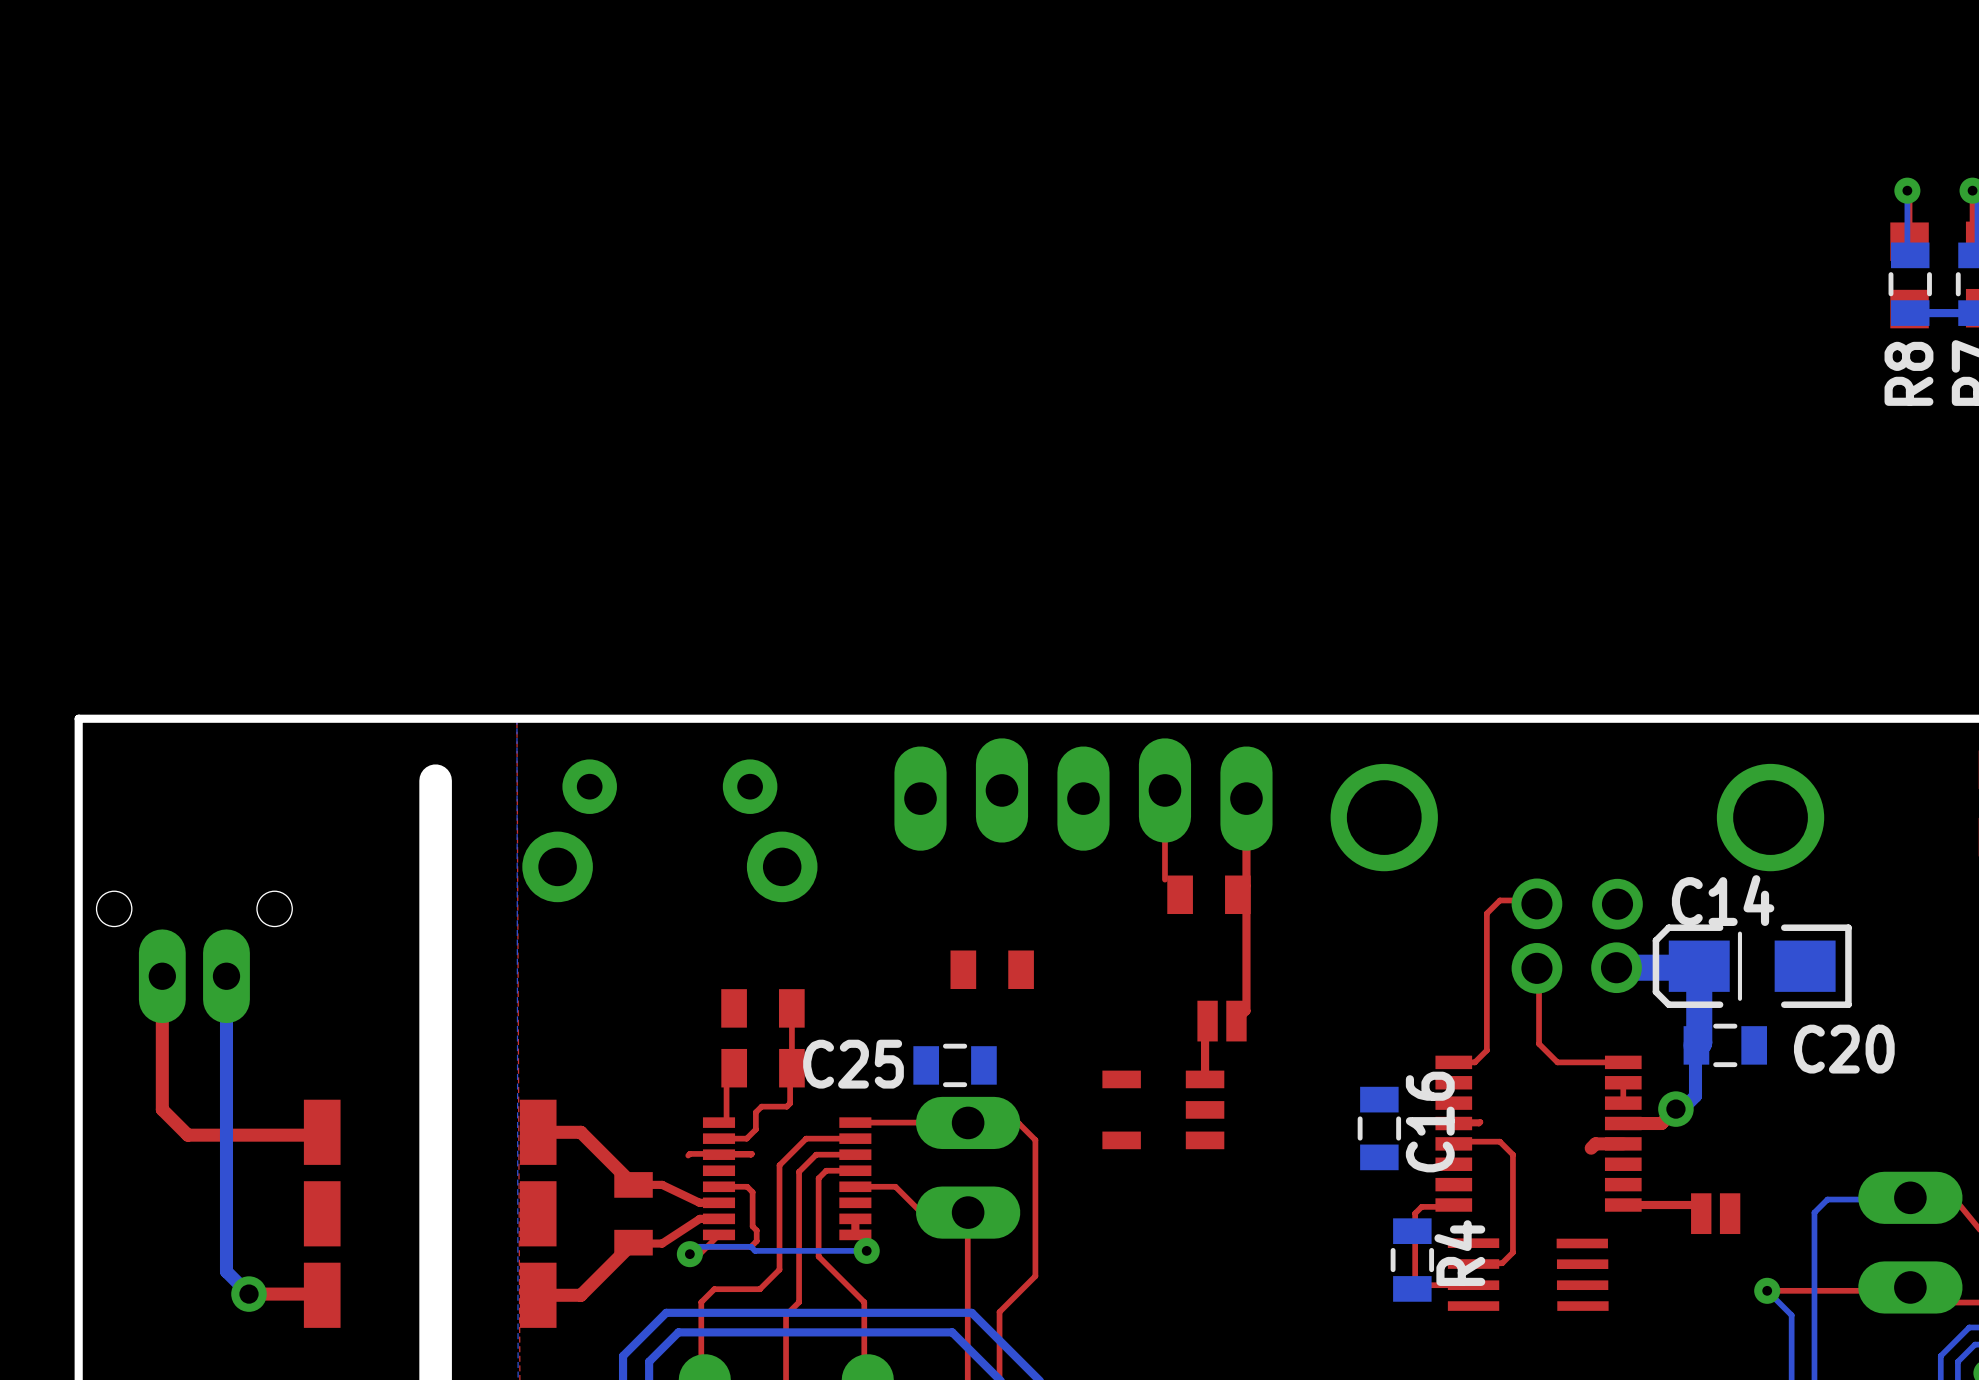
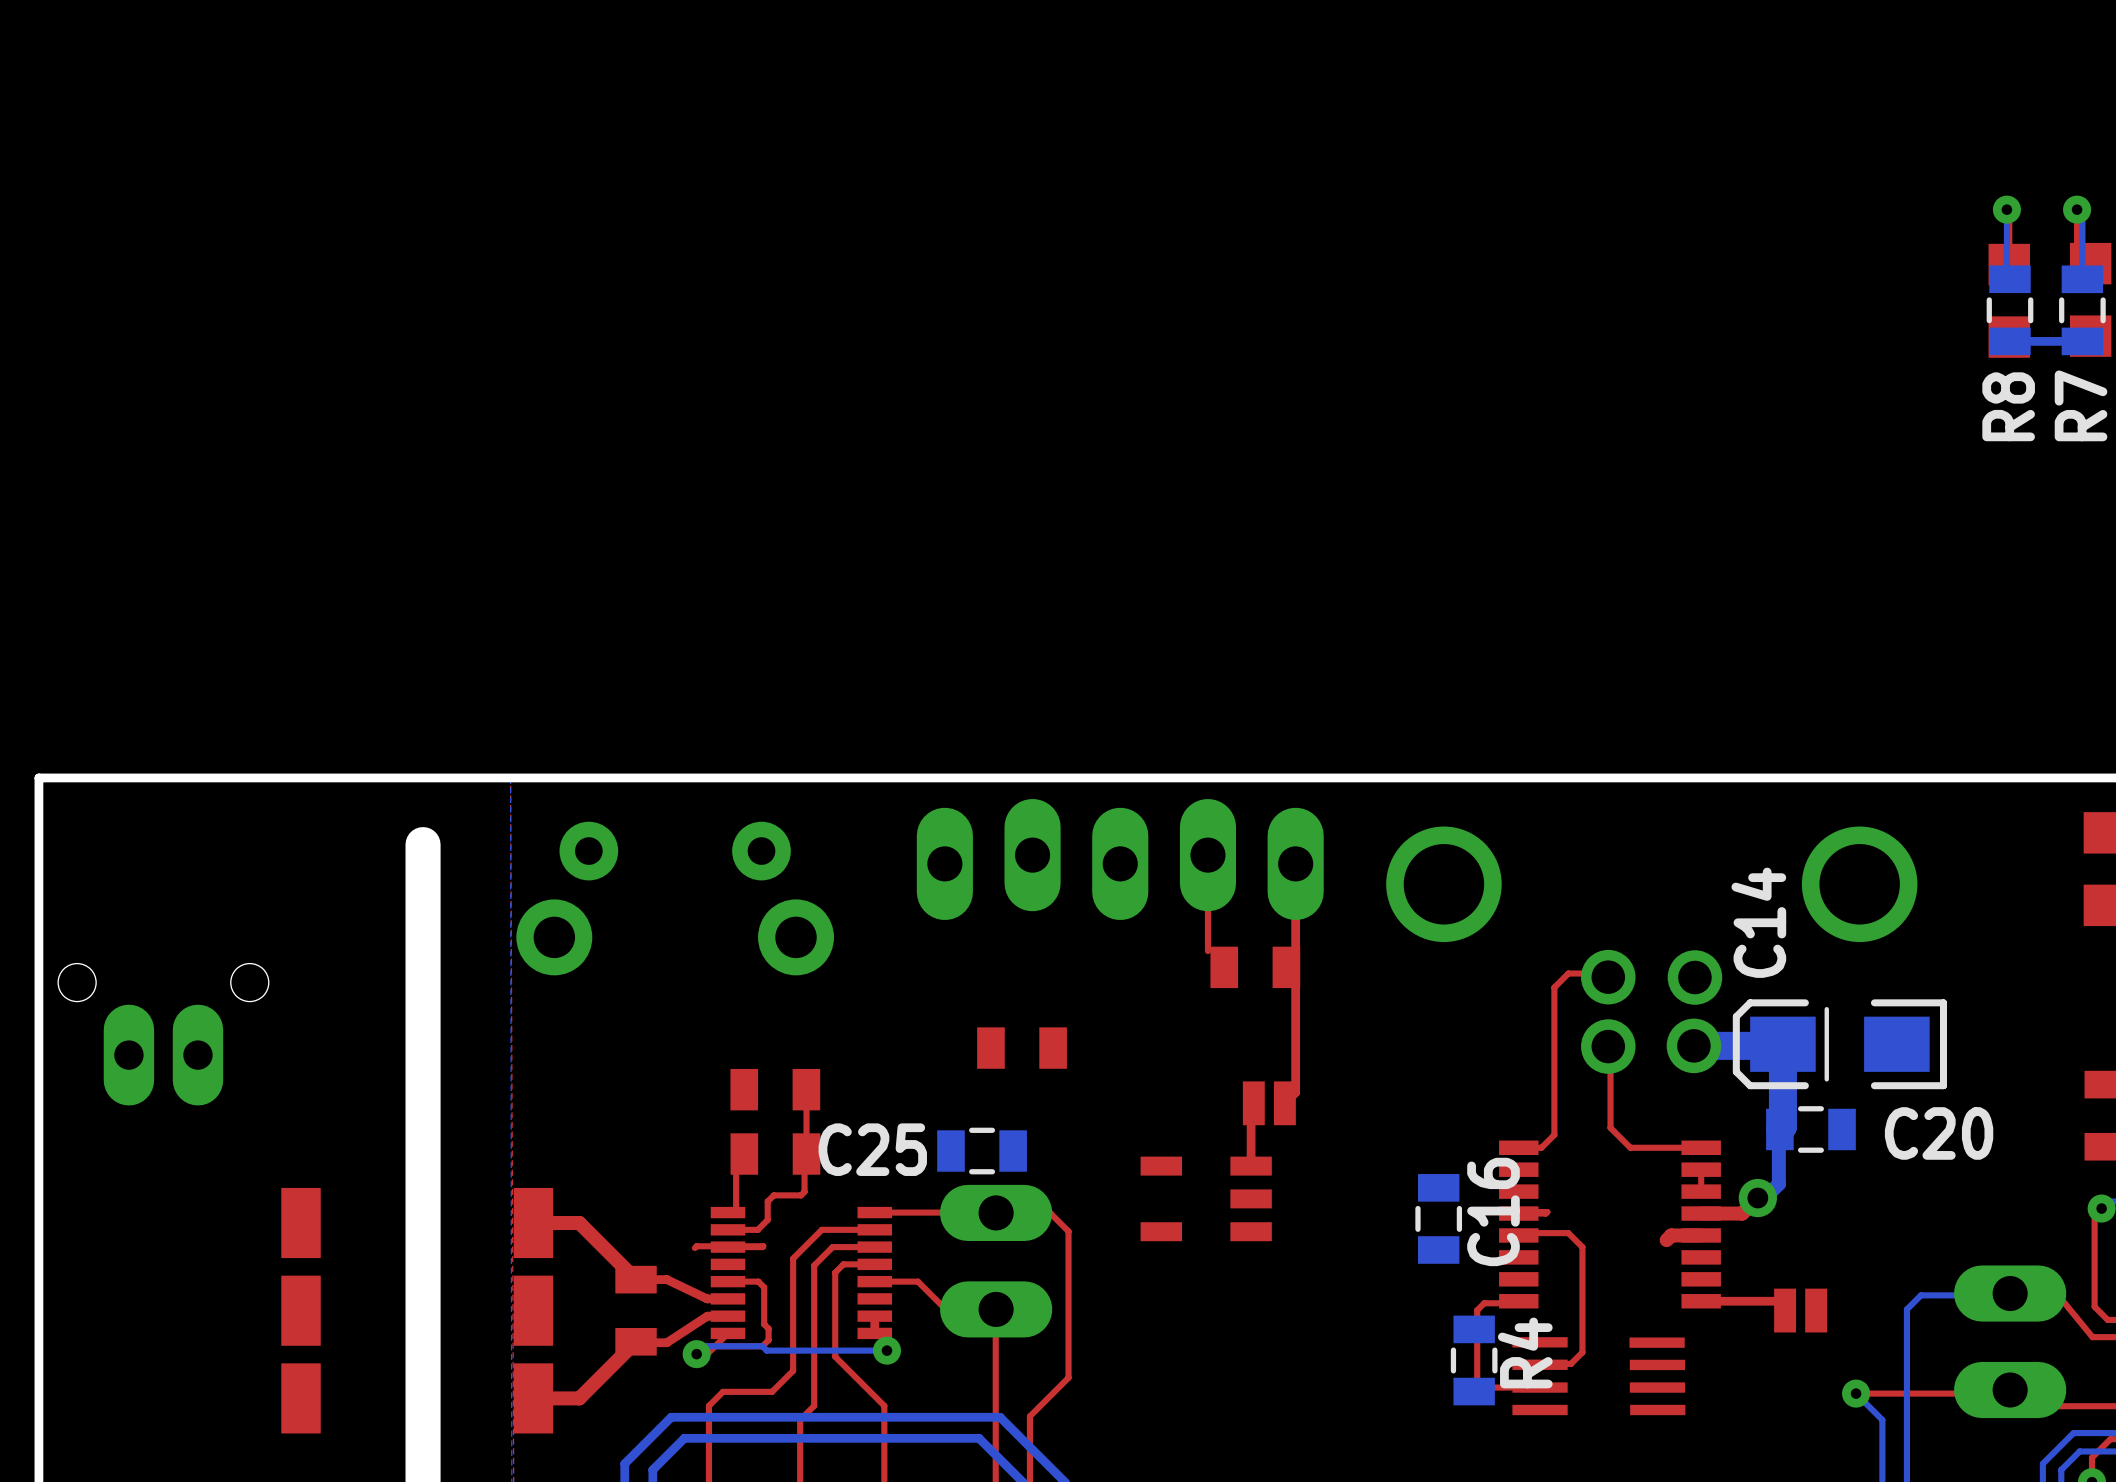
C14 name rotation: 0° (1723, 900) -> 90° counterclockwise (1758, 922)
top track: (162, 976) (162, 1109) (187, 1135) (319, 1135) (322, 1132) -> none
bottom track: (226, 976) (226, 1271) (249, 1294) -> none
top track: (249, 1294) (322, 1295) -> none
via: (249, 1294) -> none

